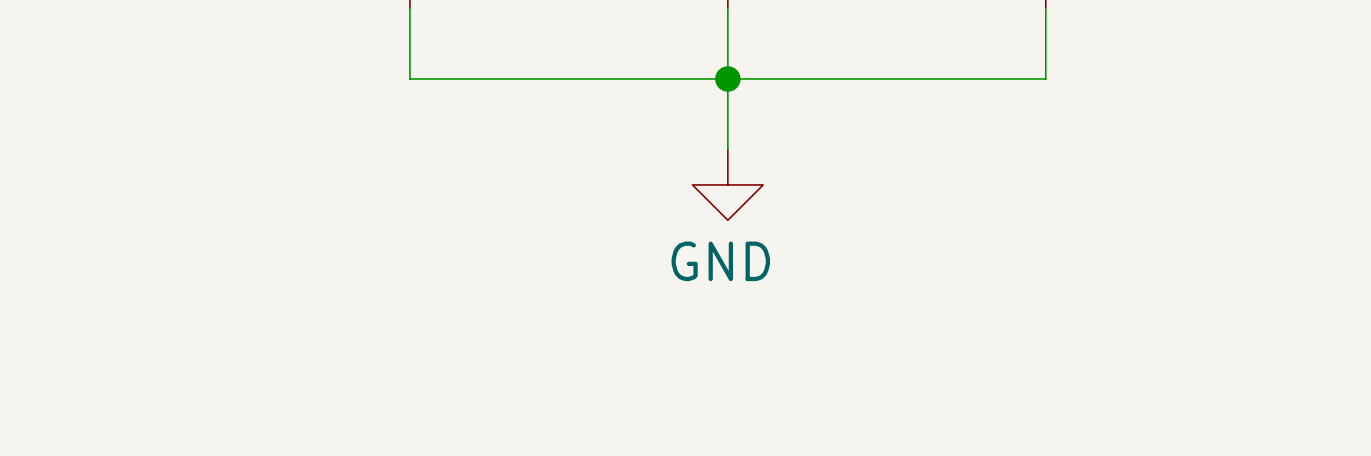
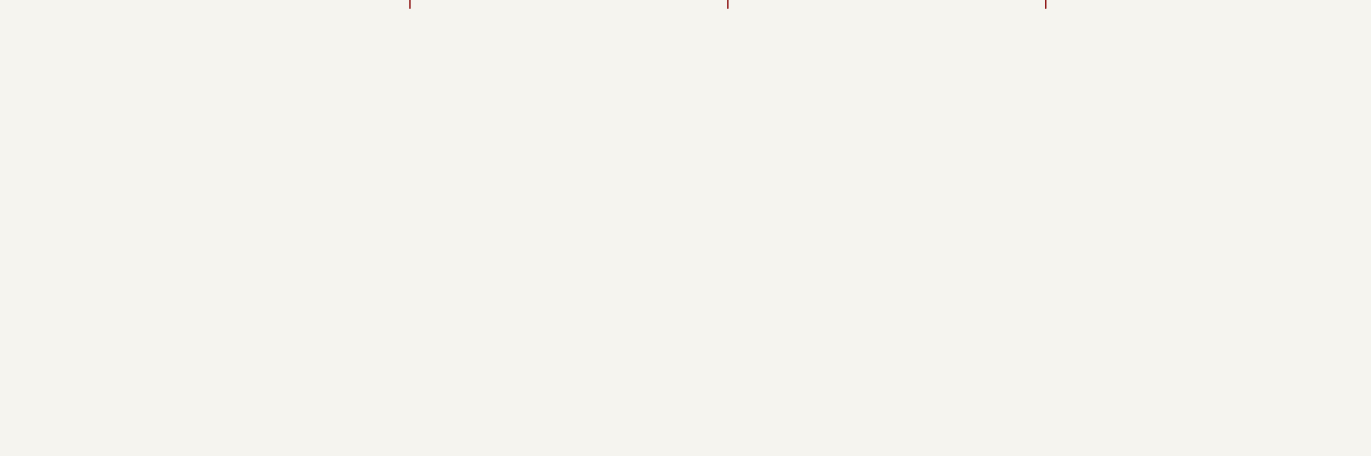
wire: (409, 8) (409, 78) (1045, 78) (1045, 8) -> none
wire: (727, 8) (727, 149) -> none
junction: (727, 78) -> none
power symbol: GND (727, 184) -> none

